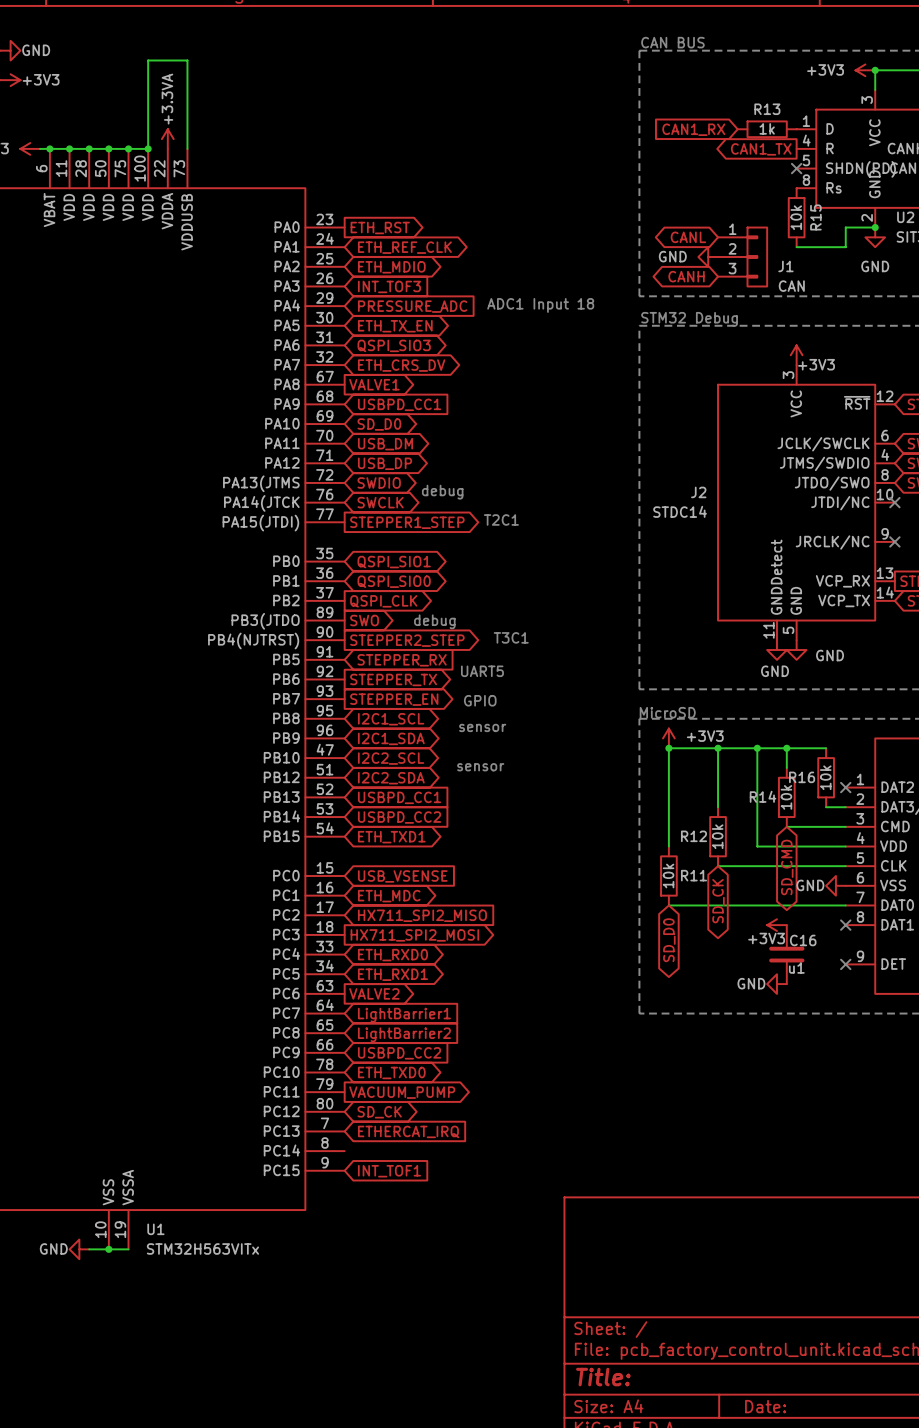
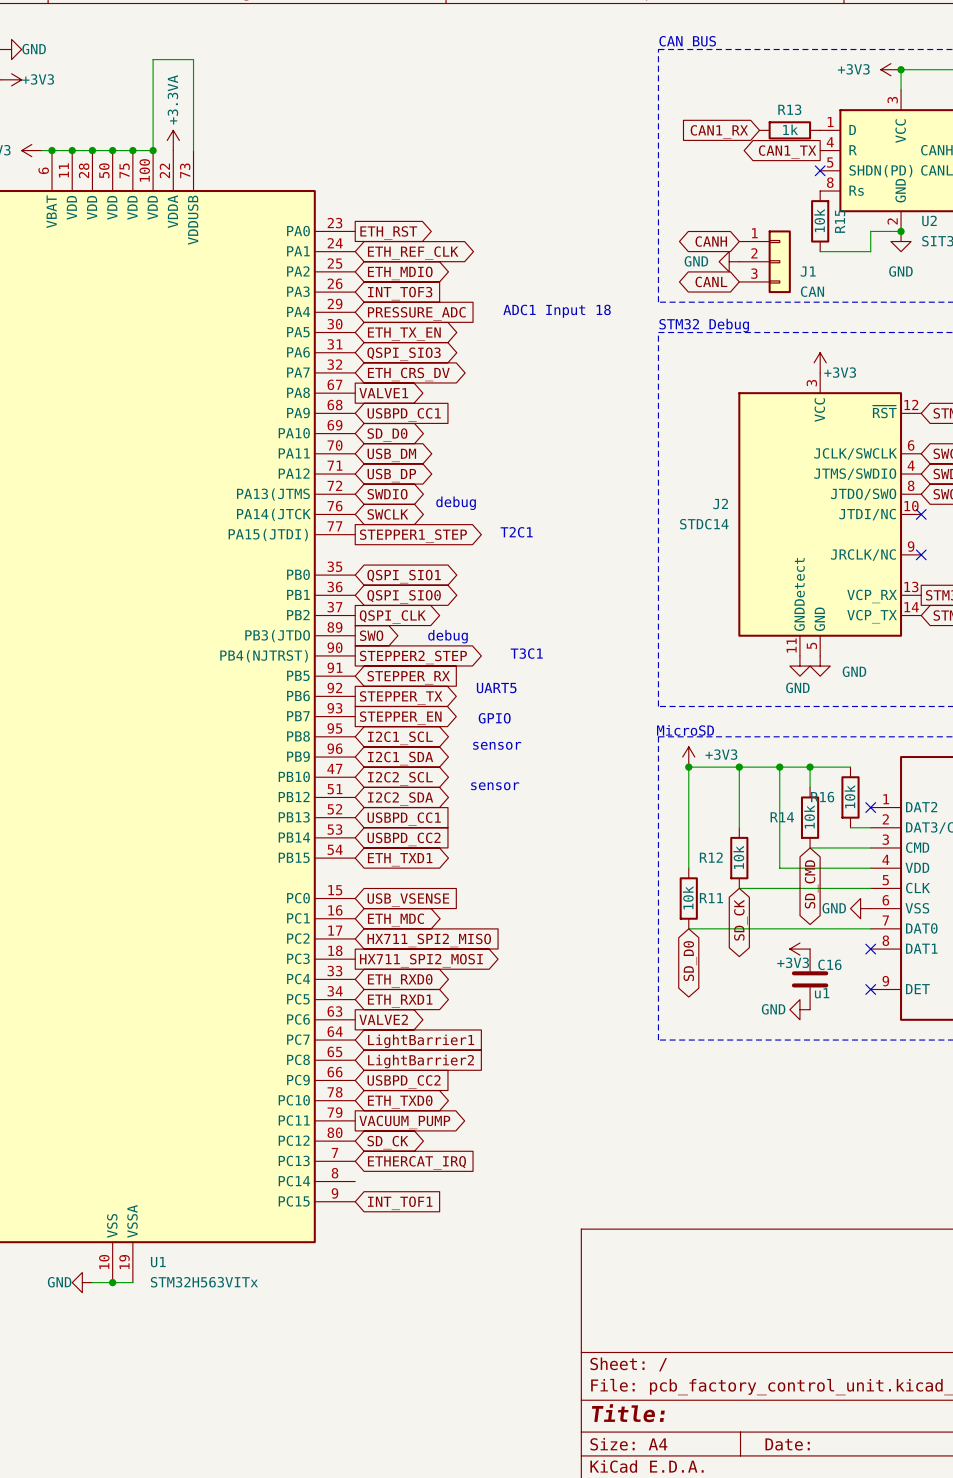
global label: CANL (688, 237) -> CANH (711, 241)
global label: CANH (686, 276) -> CANL (711, 281)

